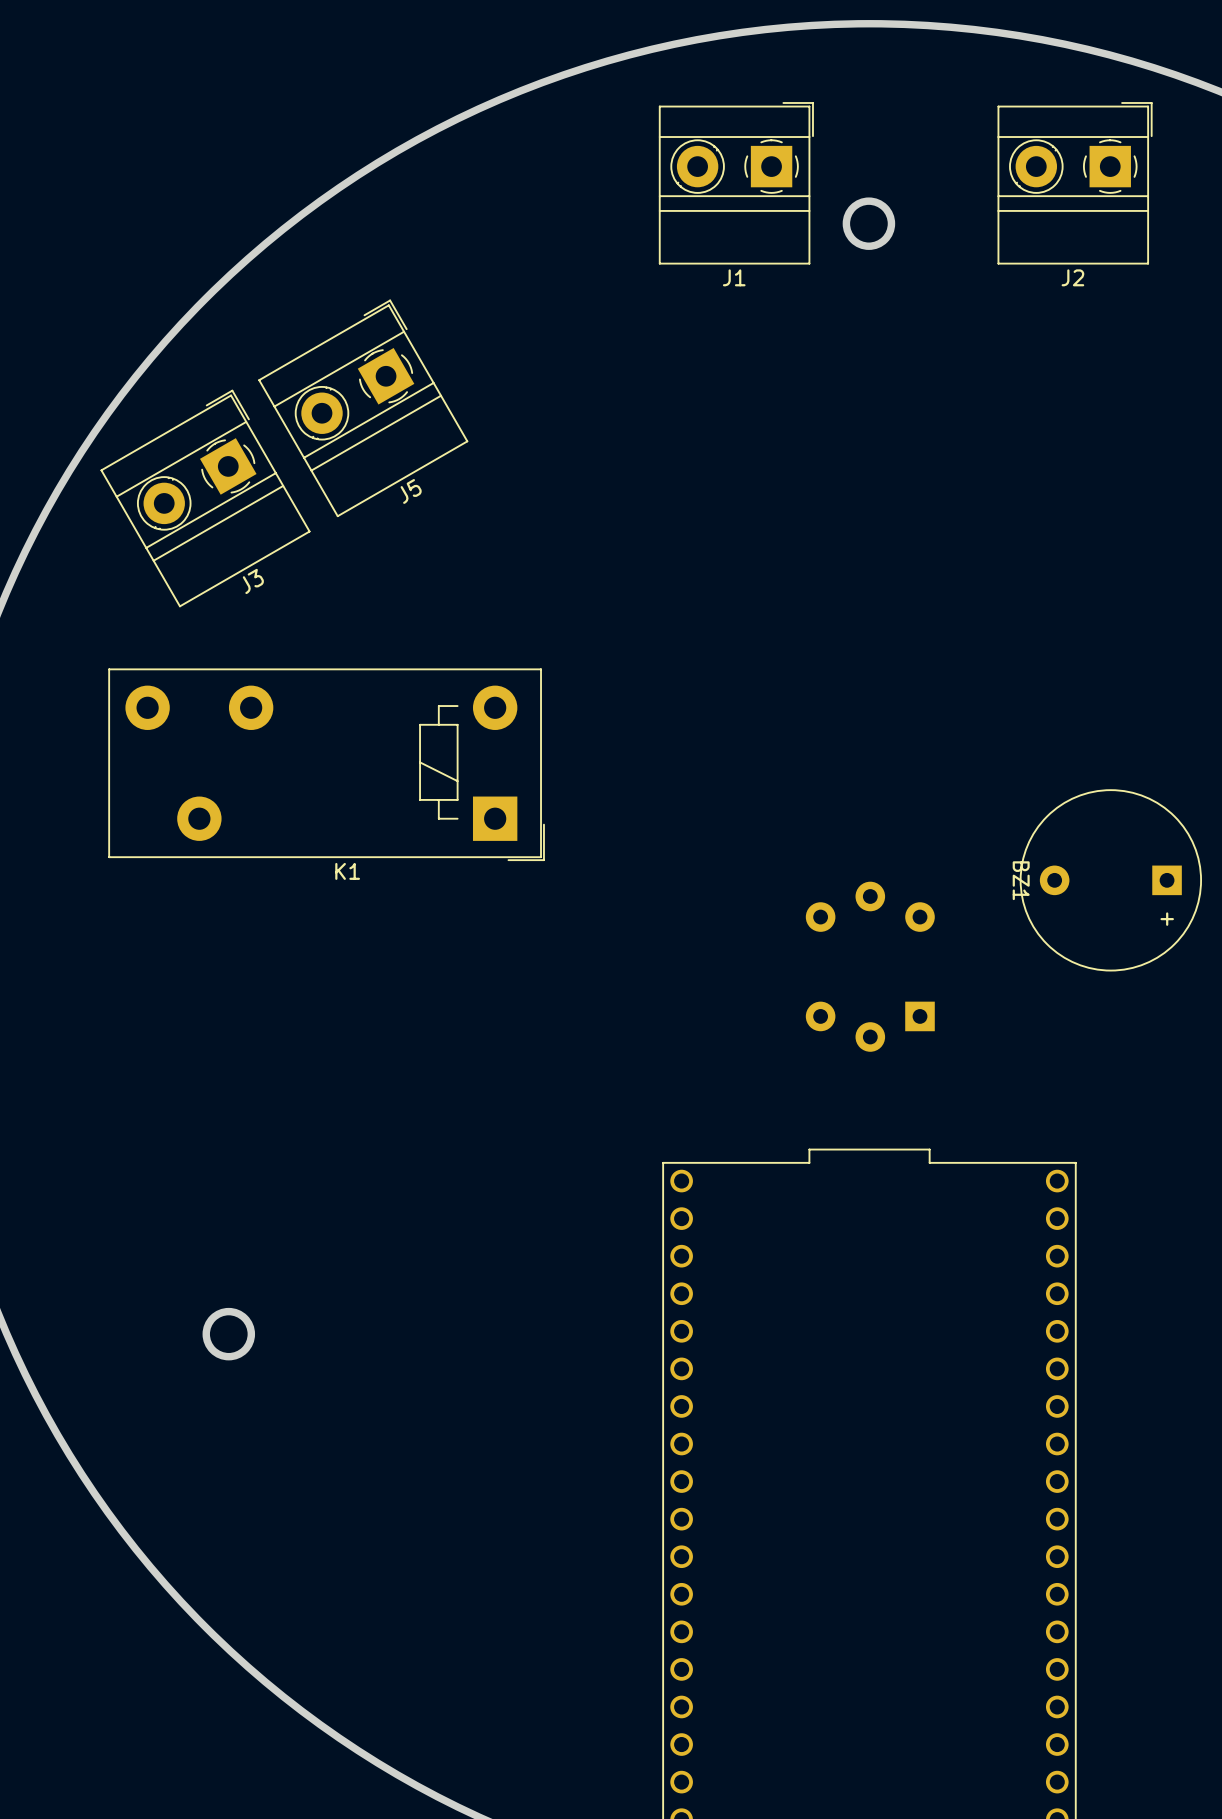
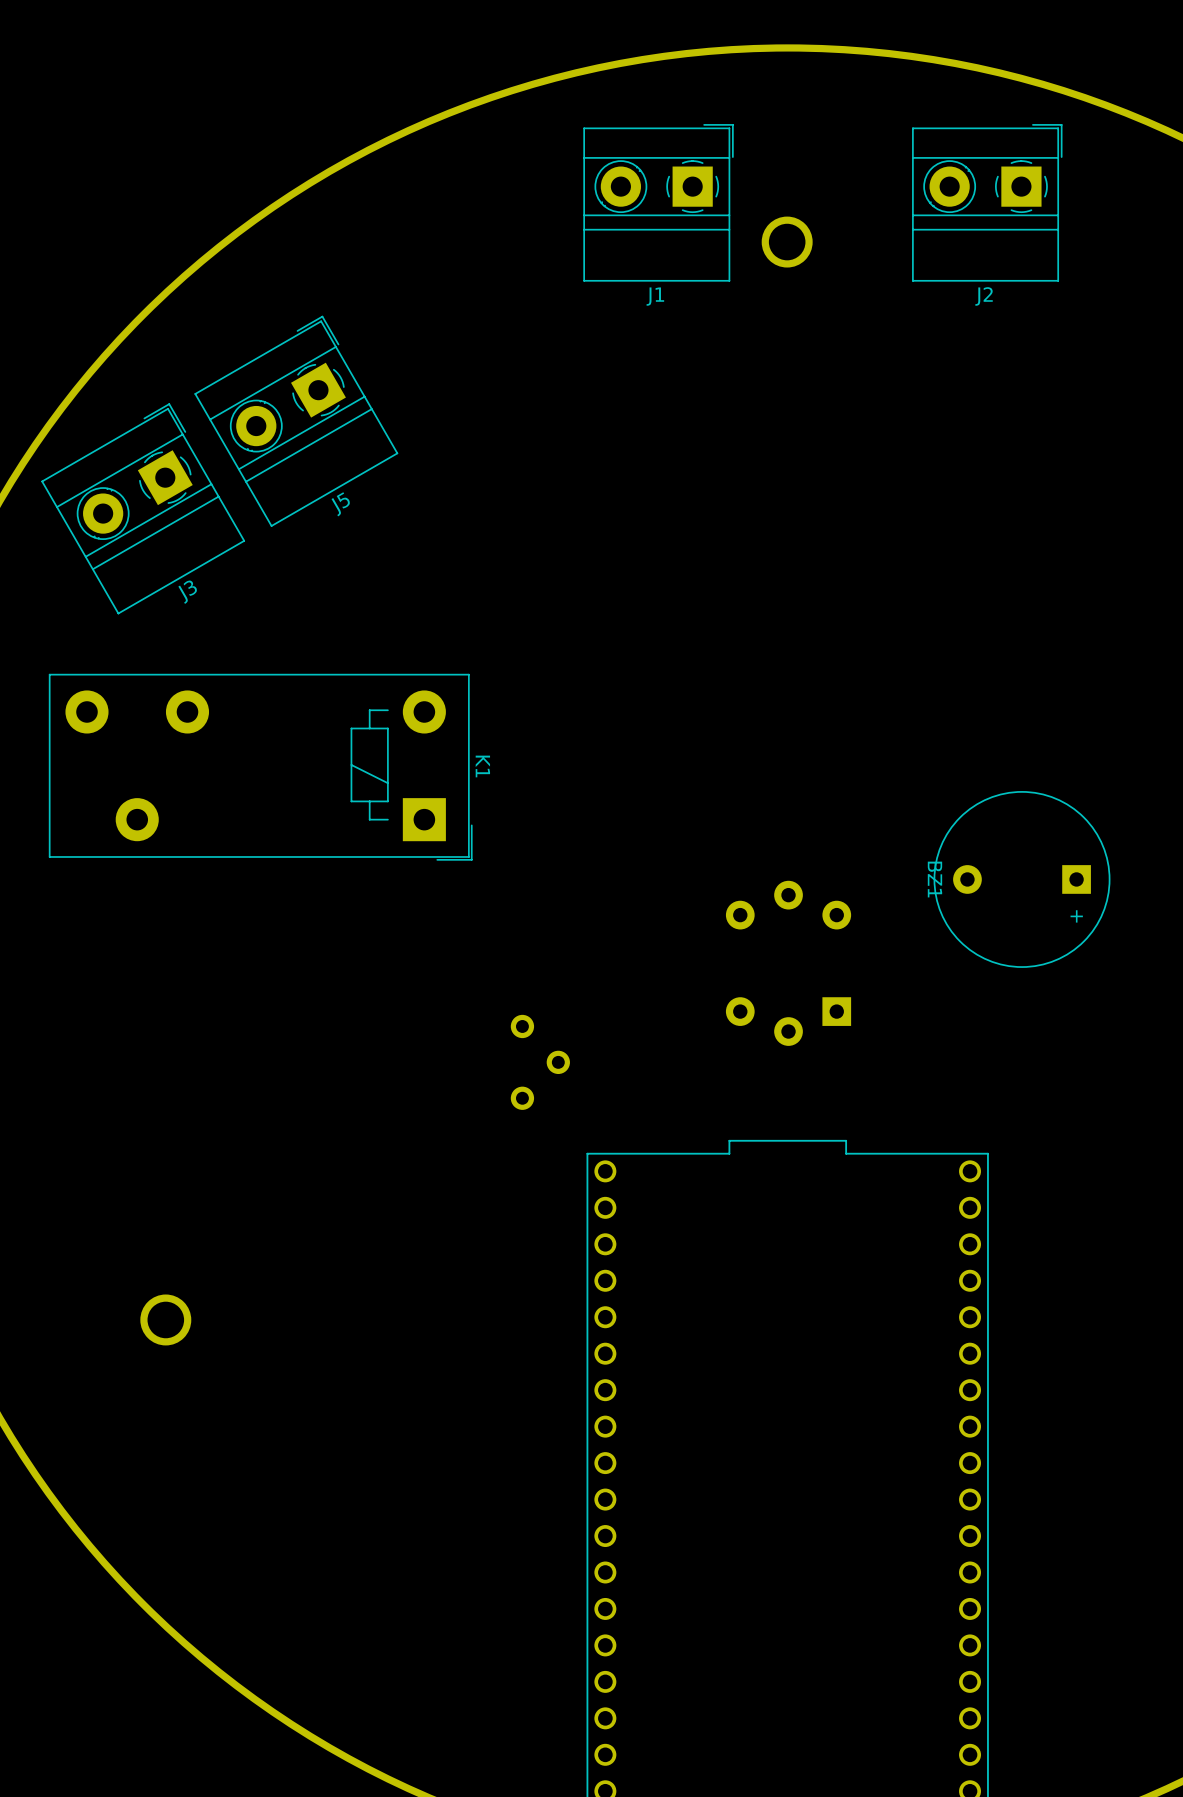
K1 name rotation: 0° (347, 871) -> 90° clockwise (482, 766)
K1 name position: K1 (347, 871) -> K1 (482, 766)
part: none -> (540, 1062)

